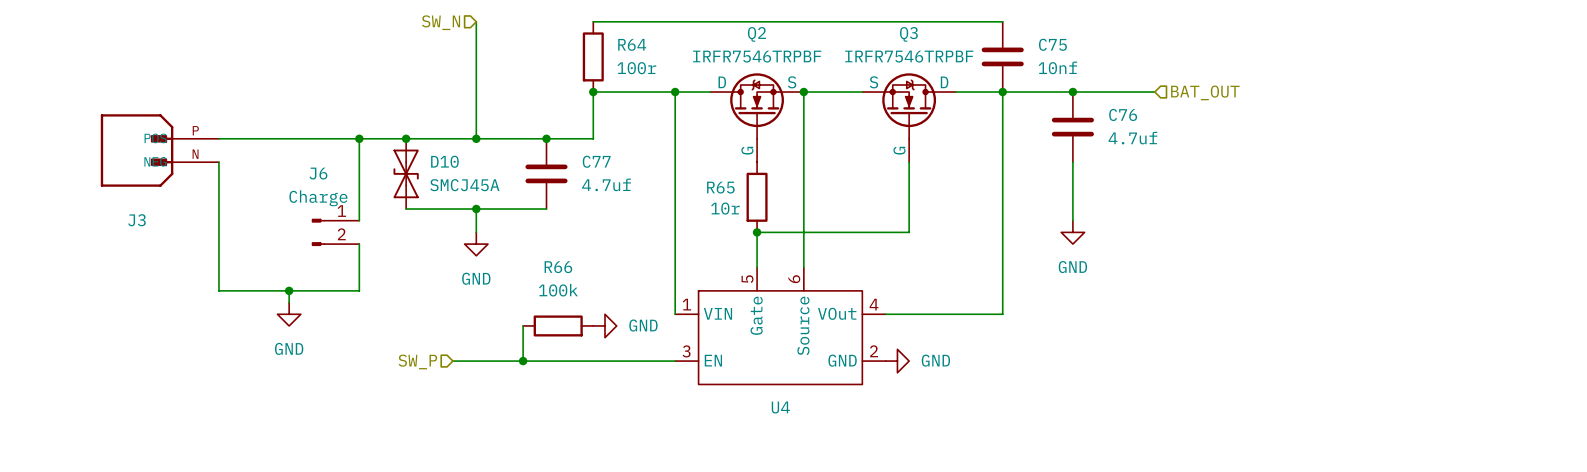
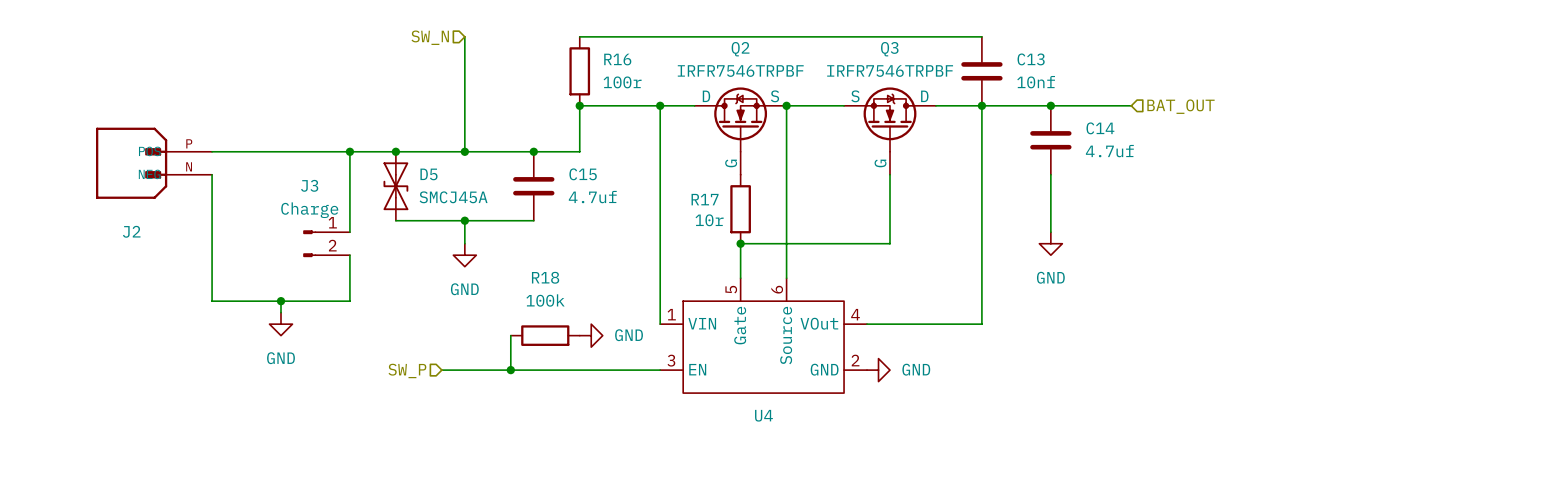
R64 name: R64 (632, 44) -> R16 (617, 59)
C75 name: C75 (1052, 44) -> C13 (1031, 59)
C76 name: C76 (1123, 114) -> C14 (1100, 128)
D10 name: D10 (444, 161) -> D5 (428, 174)
C77 name: C77 (596, 161) -> C15 (583, 174)
J6 name: J6 (318, 173) -> J3 (309, 185)
R65 name: R65 (720, 187) -> R17 (705, 199)
J3 name: J3 (137, 220) -> J2 (131, 231)
R66 name: R66 (558, 267) -> R18 (545, 277)

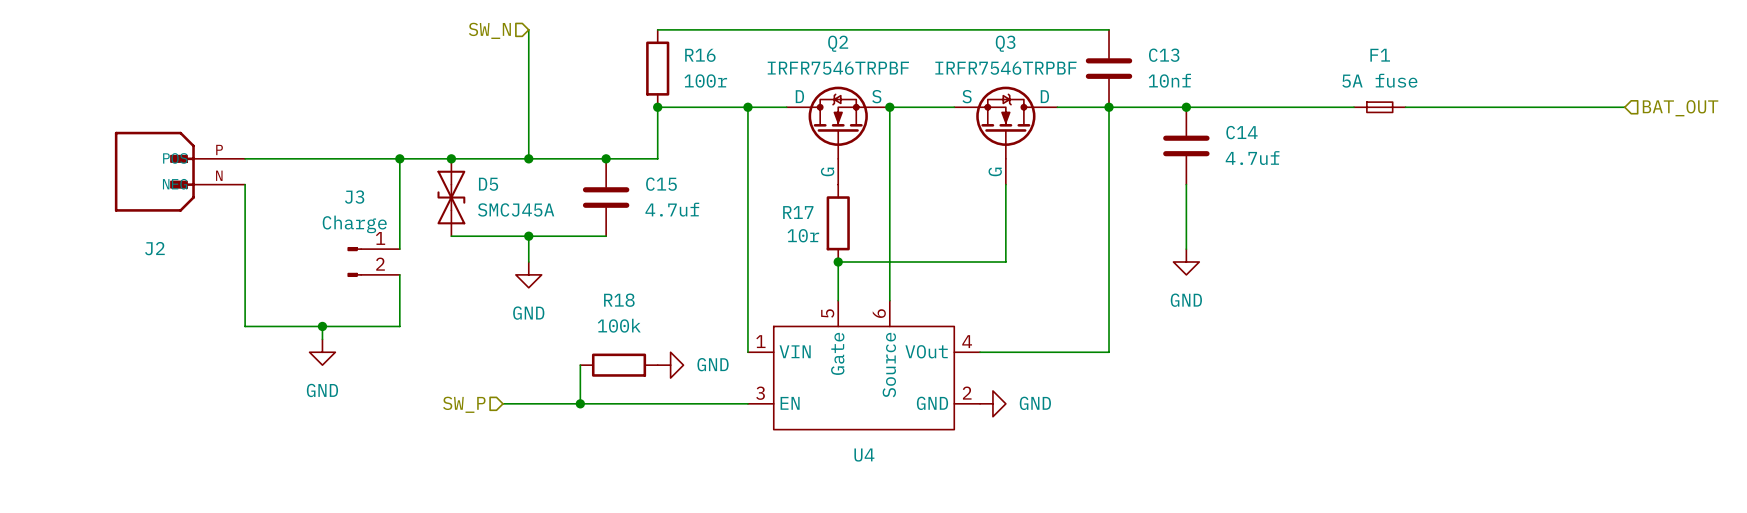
wire: none -> (1276, 107) (1353, 107)
F1: none -> 5A fuse (1379, 107)
wire: none -> (1405, 107) (1624, 107)
hierarchical label: BAT_OUT (1180, 106) -> none
hierarchical label: none -> BAT_OUT (1680, 108)

